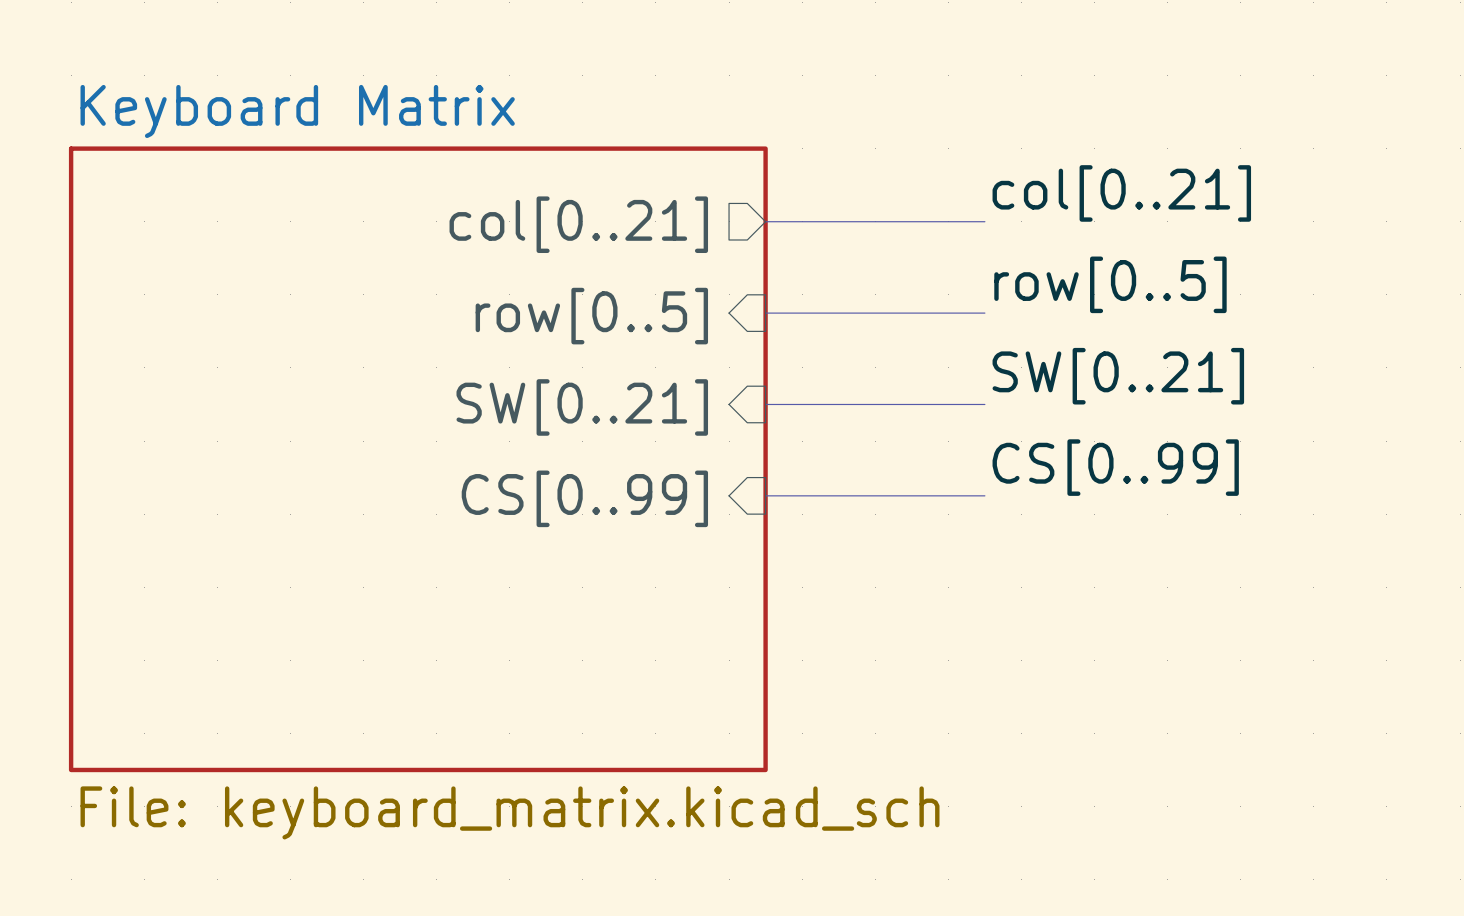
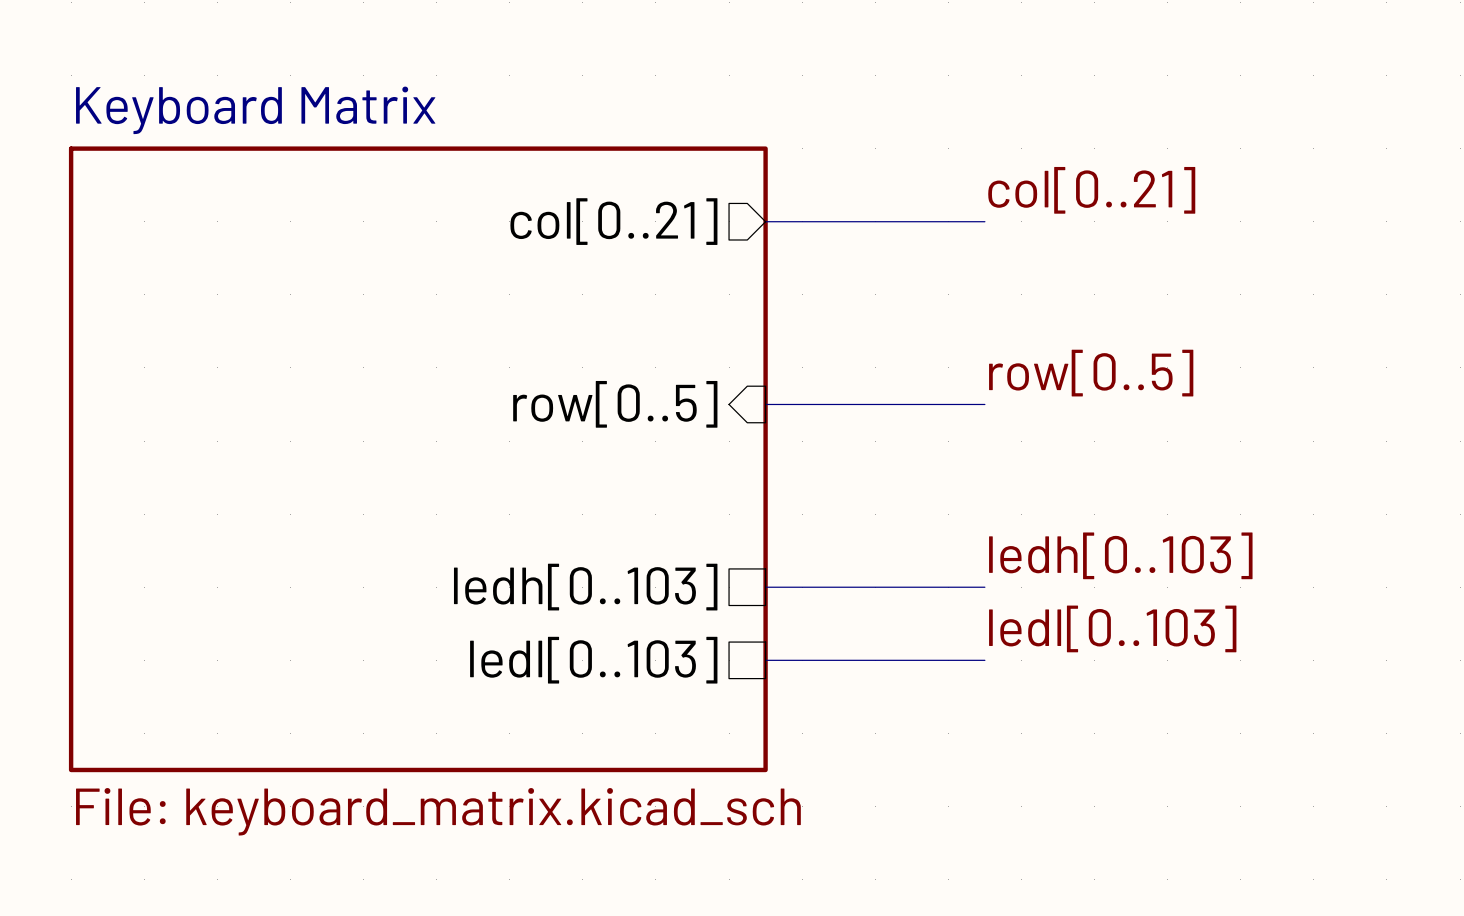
label: row[0..5] (1110, 284) -> none
bus: (765, 313) (984, 313) -> (765, 660) (984, 660)
sheet pin: row[0..5] (591, 316) -> none
label: SW[0..21] (1118, 376) -> row[0..5] (1091, 373)
sheet pin: SW[0..21] (582, 407) -> row[0..5] (615, 404)
label: CS[0..99] (1115, 467) -> none
bus: (765, 495) (984, 495) -> (765, 587) (984, 587)
sheet pin: CS[0..99] (584, 498) -> none
label: none -> ledh[0..103] (1120, 555)
sheet pin: none -> ledh[0..103] (585, 587)
label: none -> ledl[0..103] (1112, 628)
sheet pin: none -> ledl[0..103] (593, 660)

